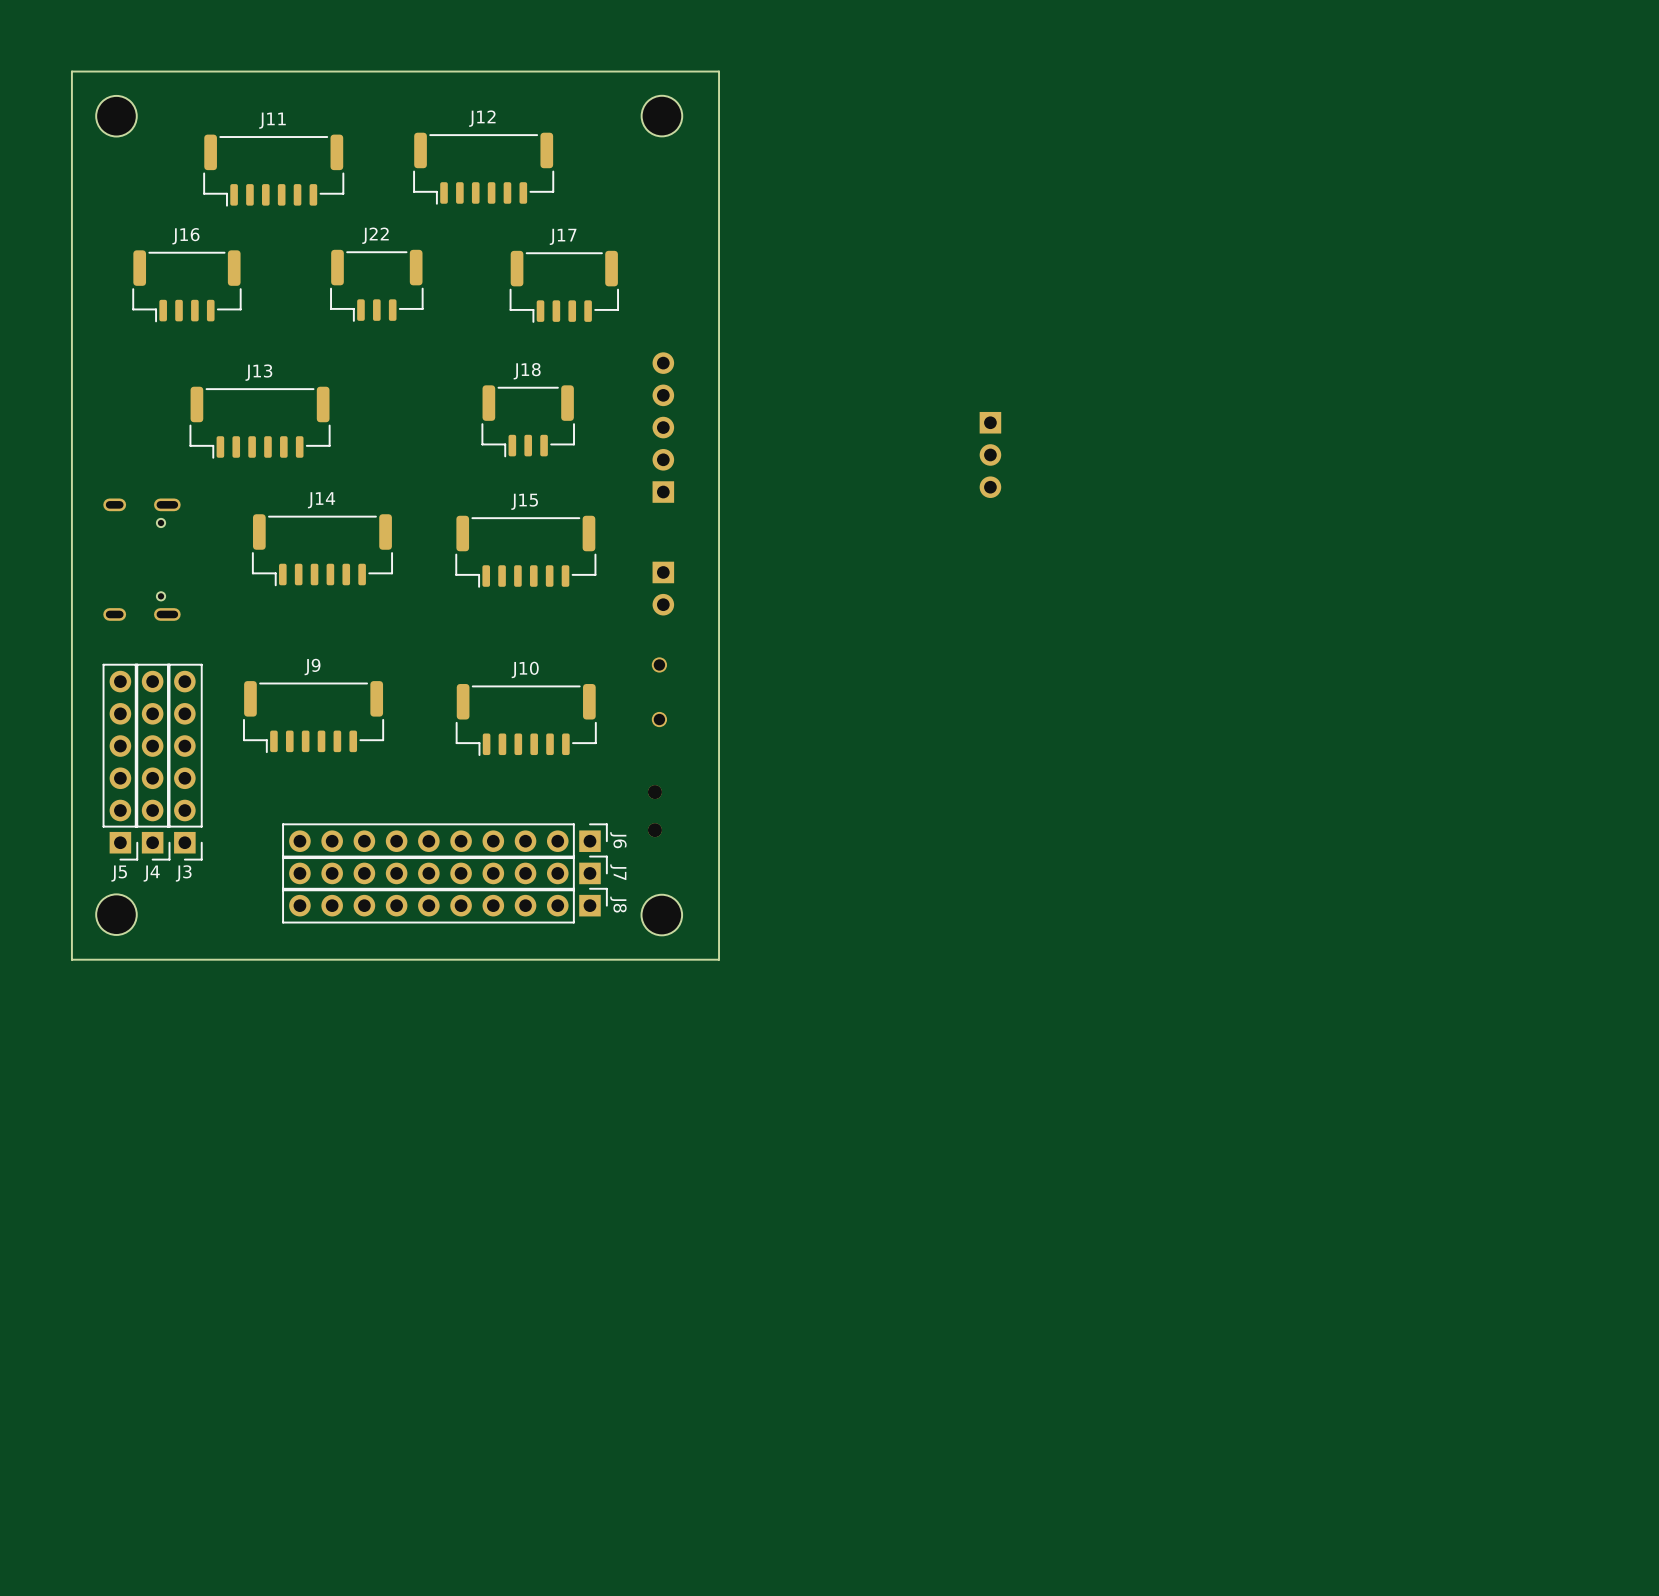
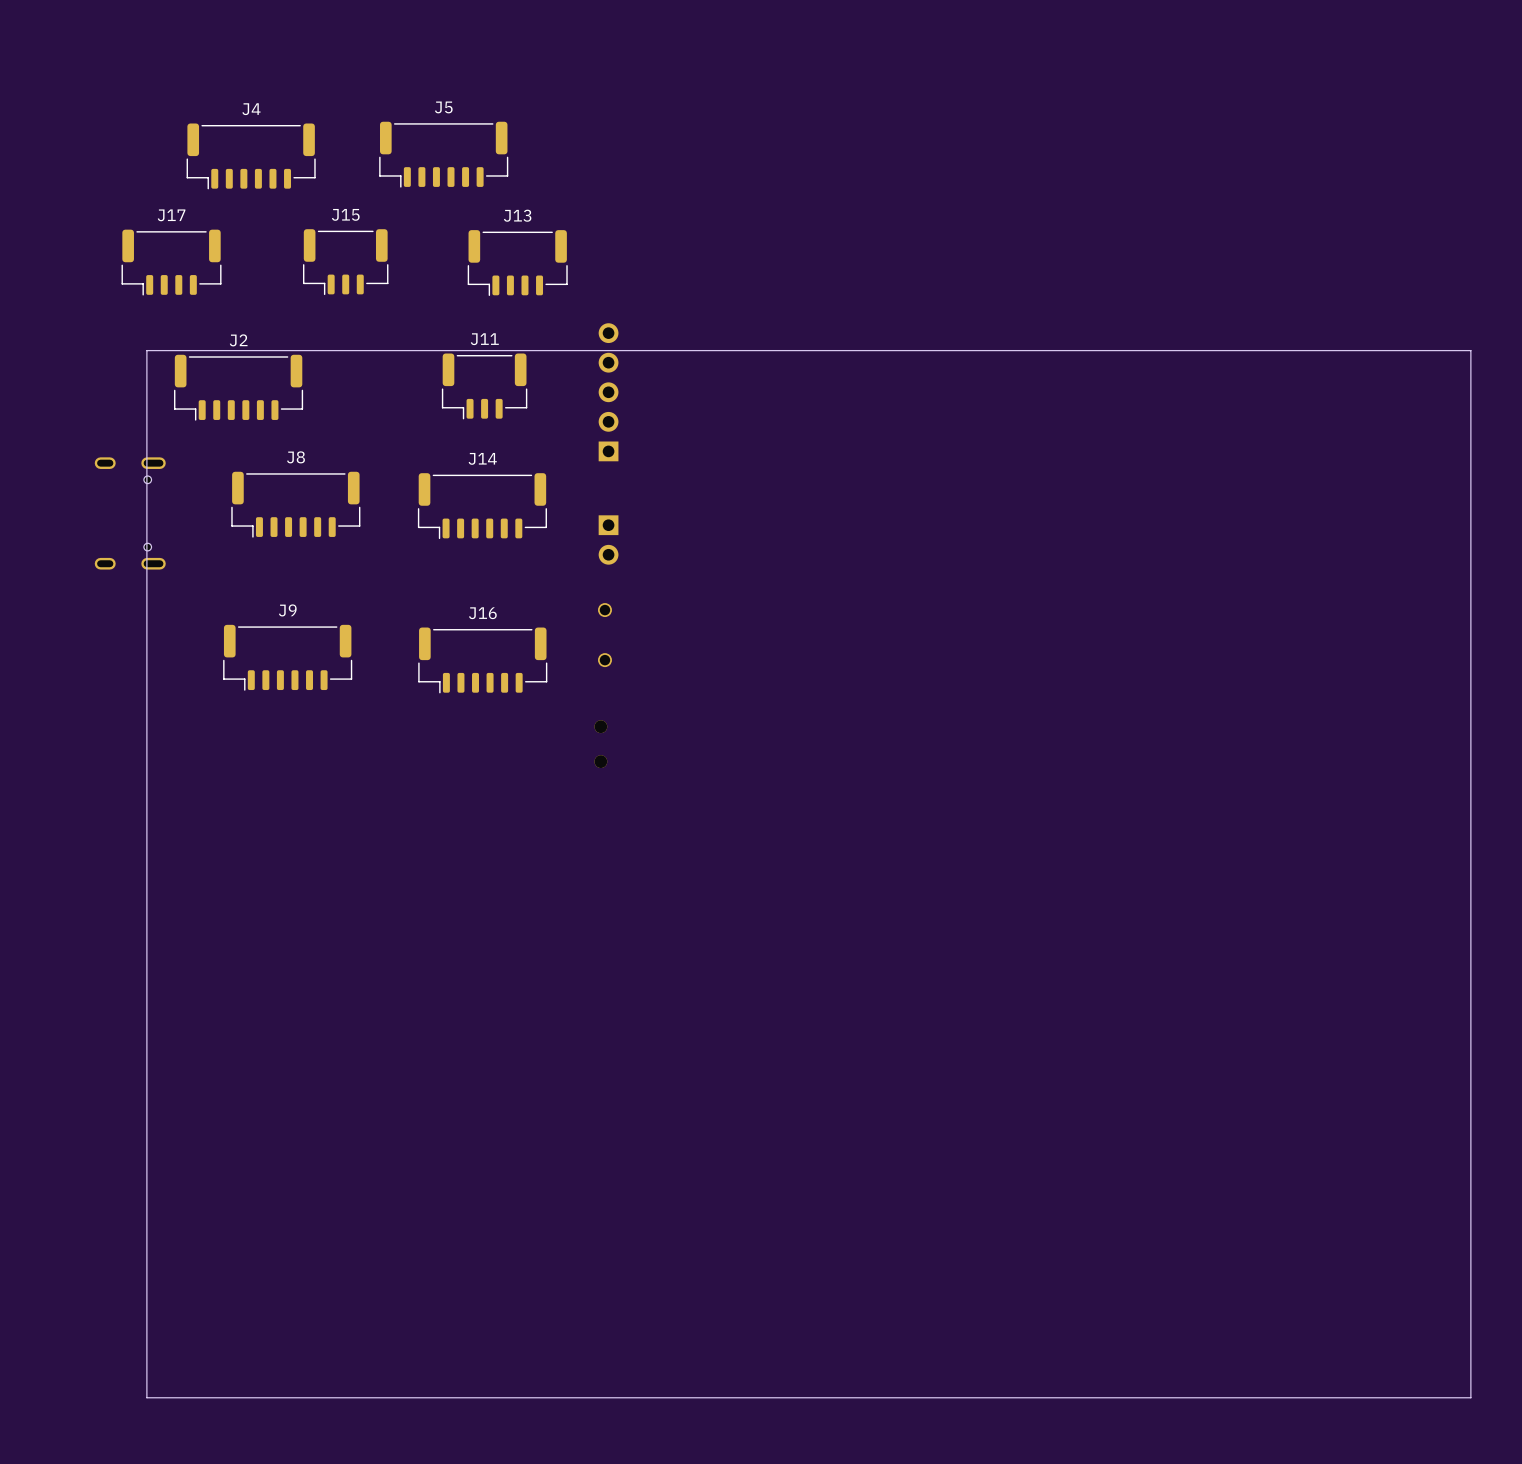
board edge: (719, 71) (71, 71) (71, 959) (719, 959) (719, 71) -> none
part: (116, 116) -> none
part: (661, 116) -> none
J12 name: J12 (482, 118) -> J5 (443, 107)
J11 name: J11 (272, 120) -> J4 (251, 109)
J22 name: J22 (375, 235) -> J15 (345, 214)
J16 name: J16 (185, 236) -> J17 (171, 215)
J17 name: J17 (563, 236) -> J13 (517, 215)
J18 name: J18 (527, 371) -> J11 (484, 339)
J13 name: J13 (258, 372) -> J2 (238, 340)
board edge: none -> (1470, 350) (146, 350) (146, 1397) (1470, 1397) (1470, 350)
part: (990, 454) -> none
J14 name: J14 (321, 500) -> J8 (295, 457)
J15 name: J15 (524, 501) -> J14 (482, 458)
J10 name: J10 (525, 669) -> J16 (482, 613)
J5: (120, 762) -> none
J4: (152, 762) -> none
J3: (184, 762) -> none
J6: (444, 841) -> none
J7: (444, 873) -> none
J8: (444, 905) -> none
part: (116, 914) -> none
part: (661, 915) -> none

